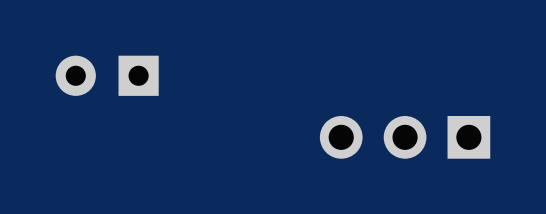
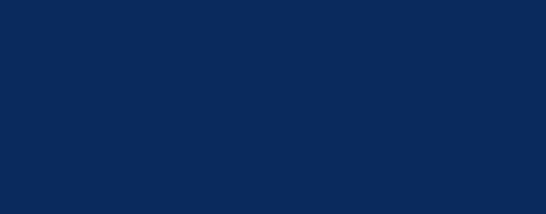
part: (107, 75) -> none
part: (405, 137) -> none

